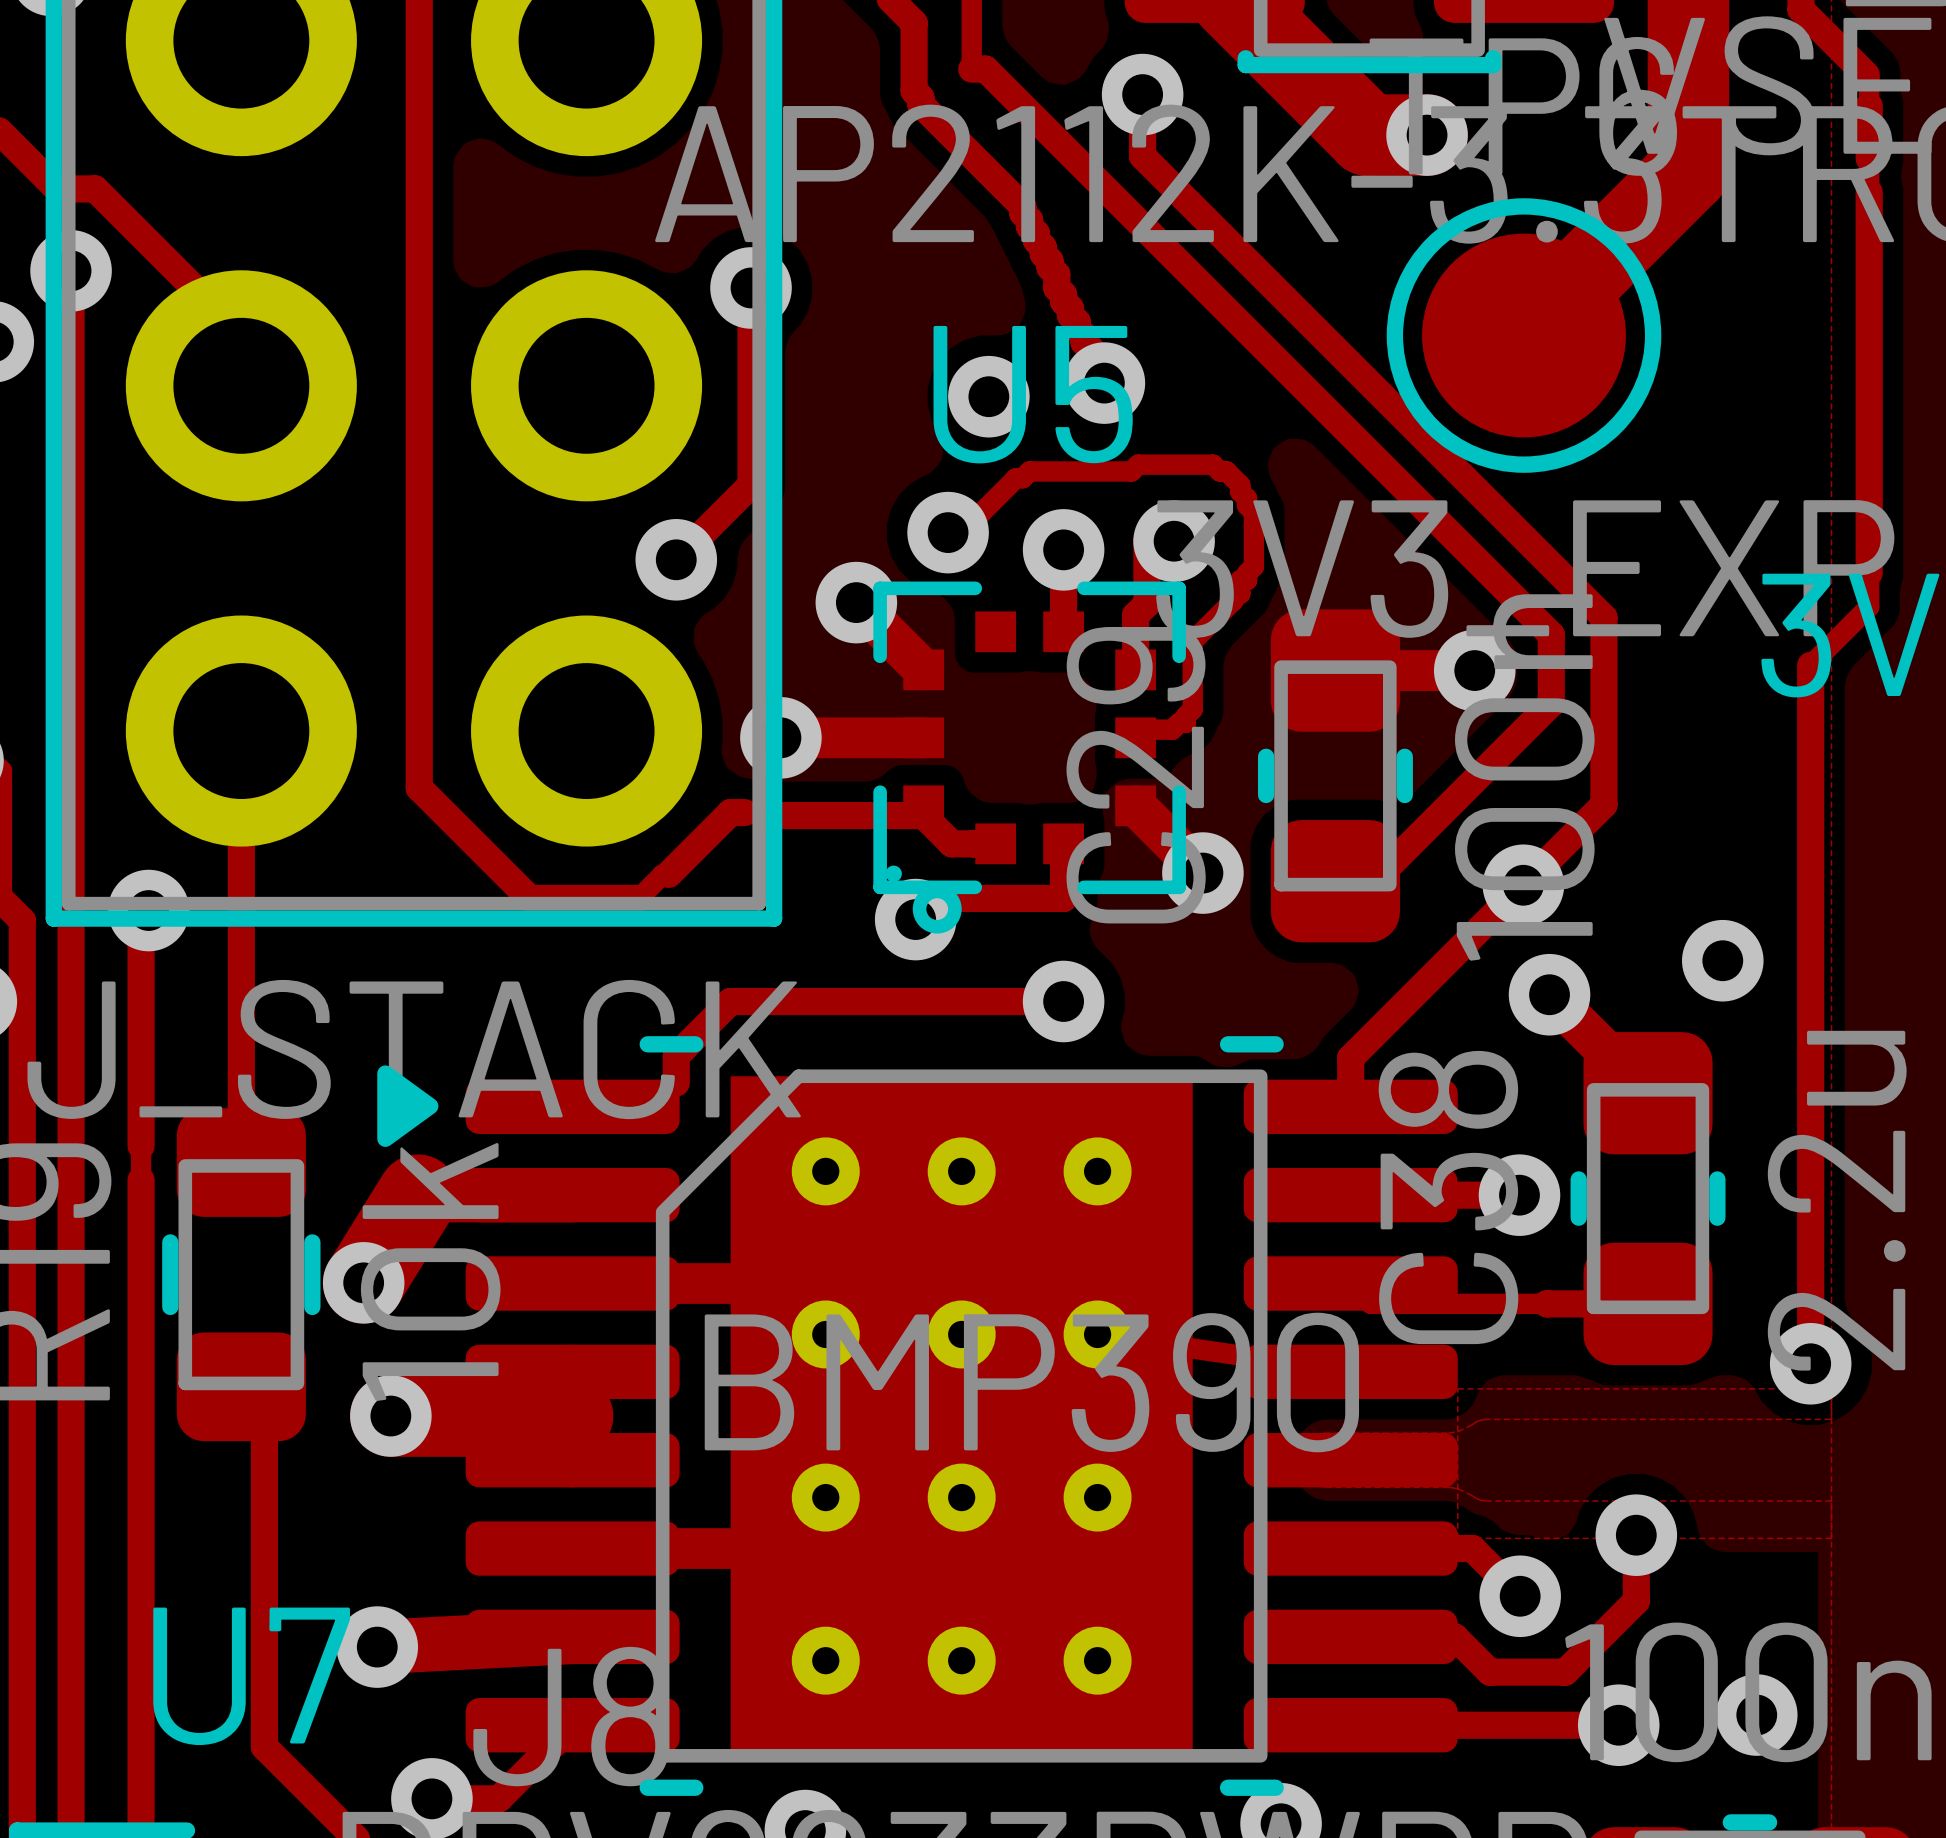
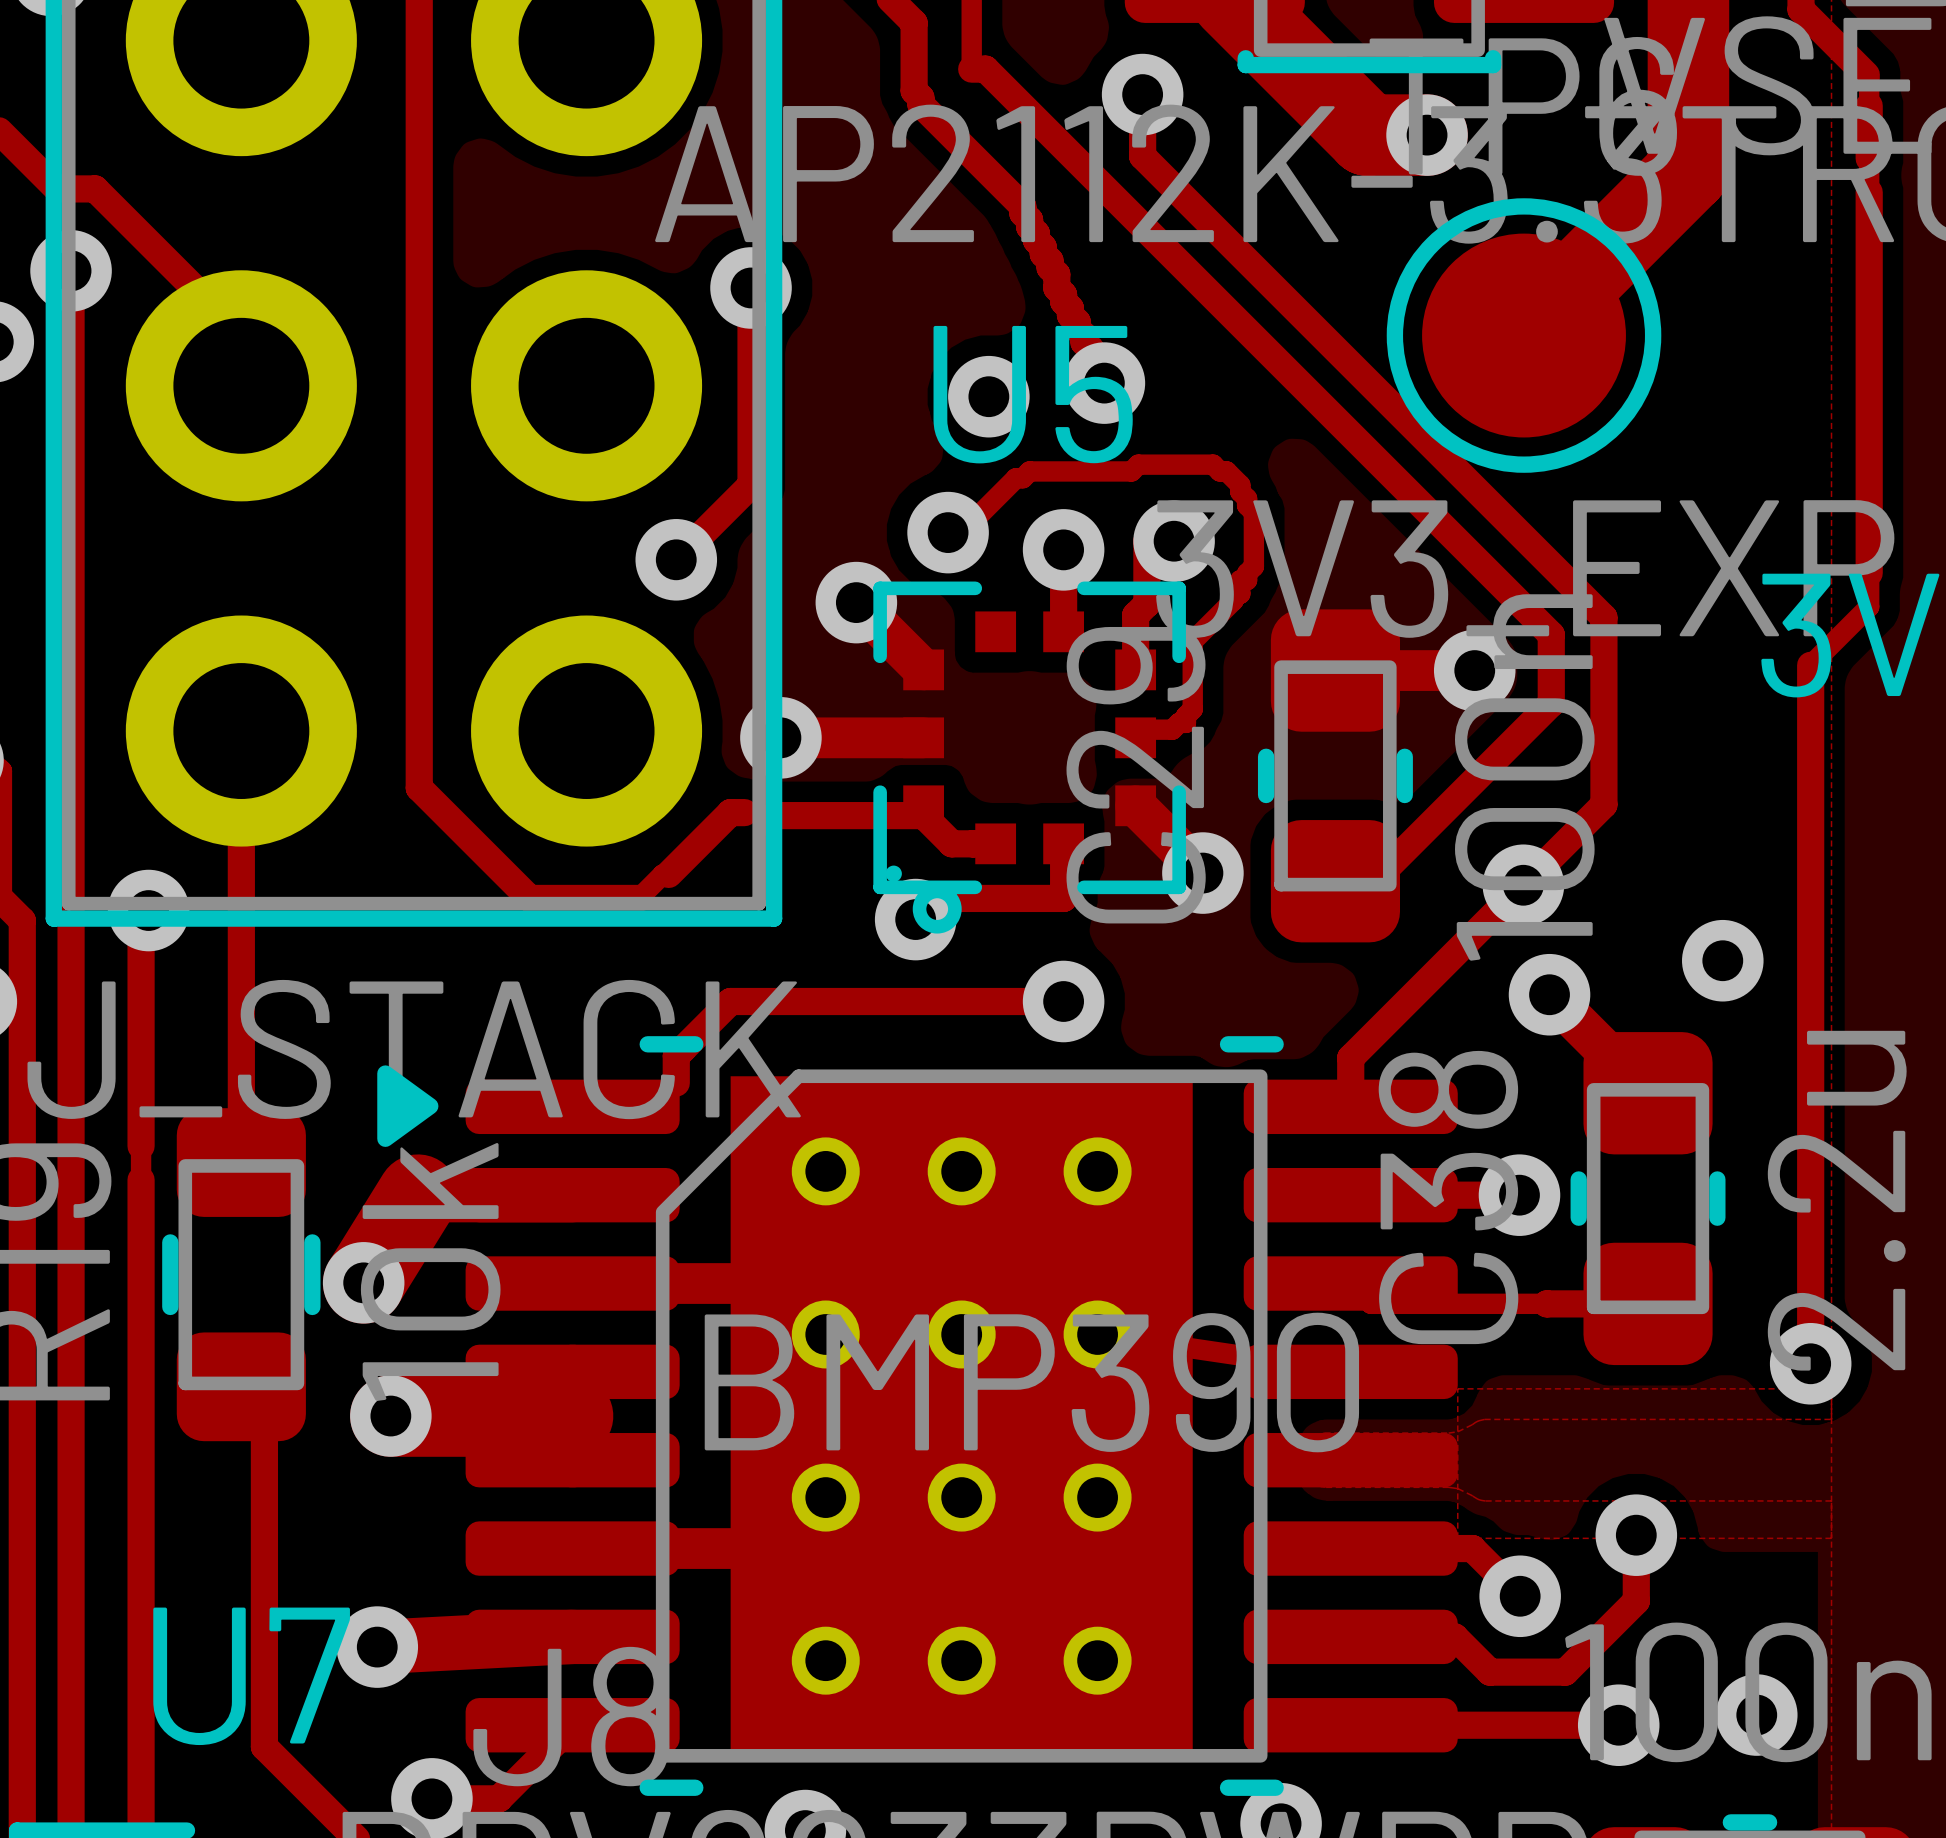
U7 footprint: [377, 1036, 1458, 1796] -> [377, 1036, 1458, 1796]

